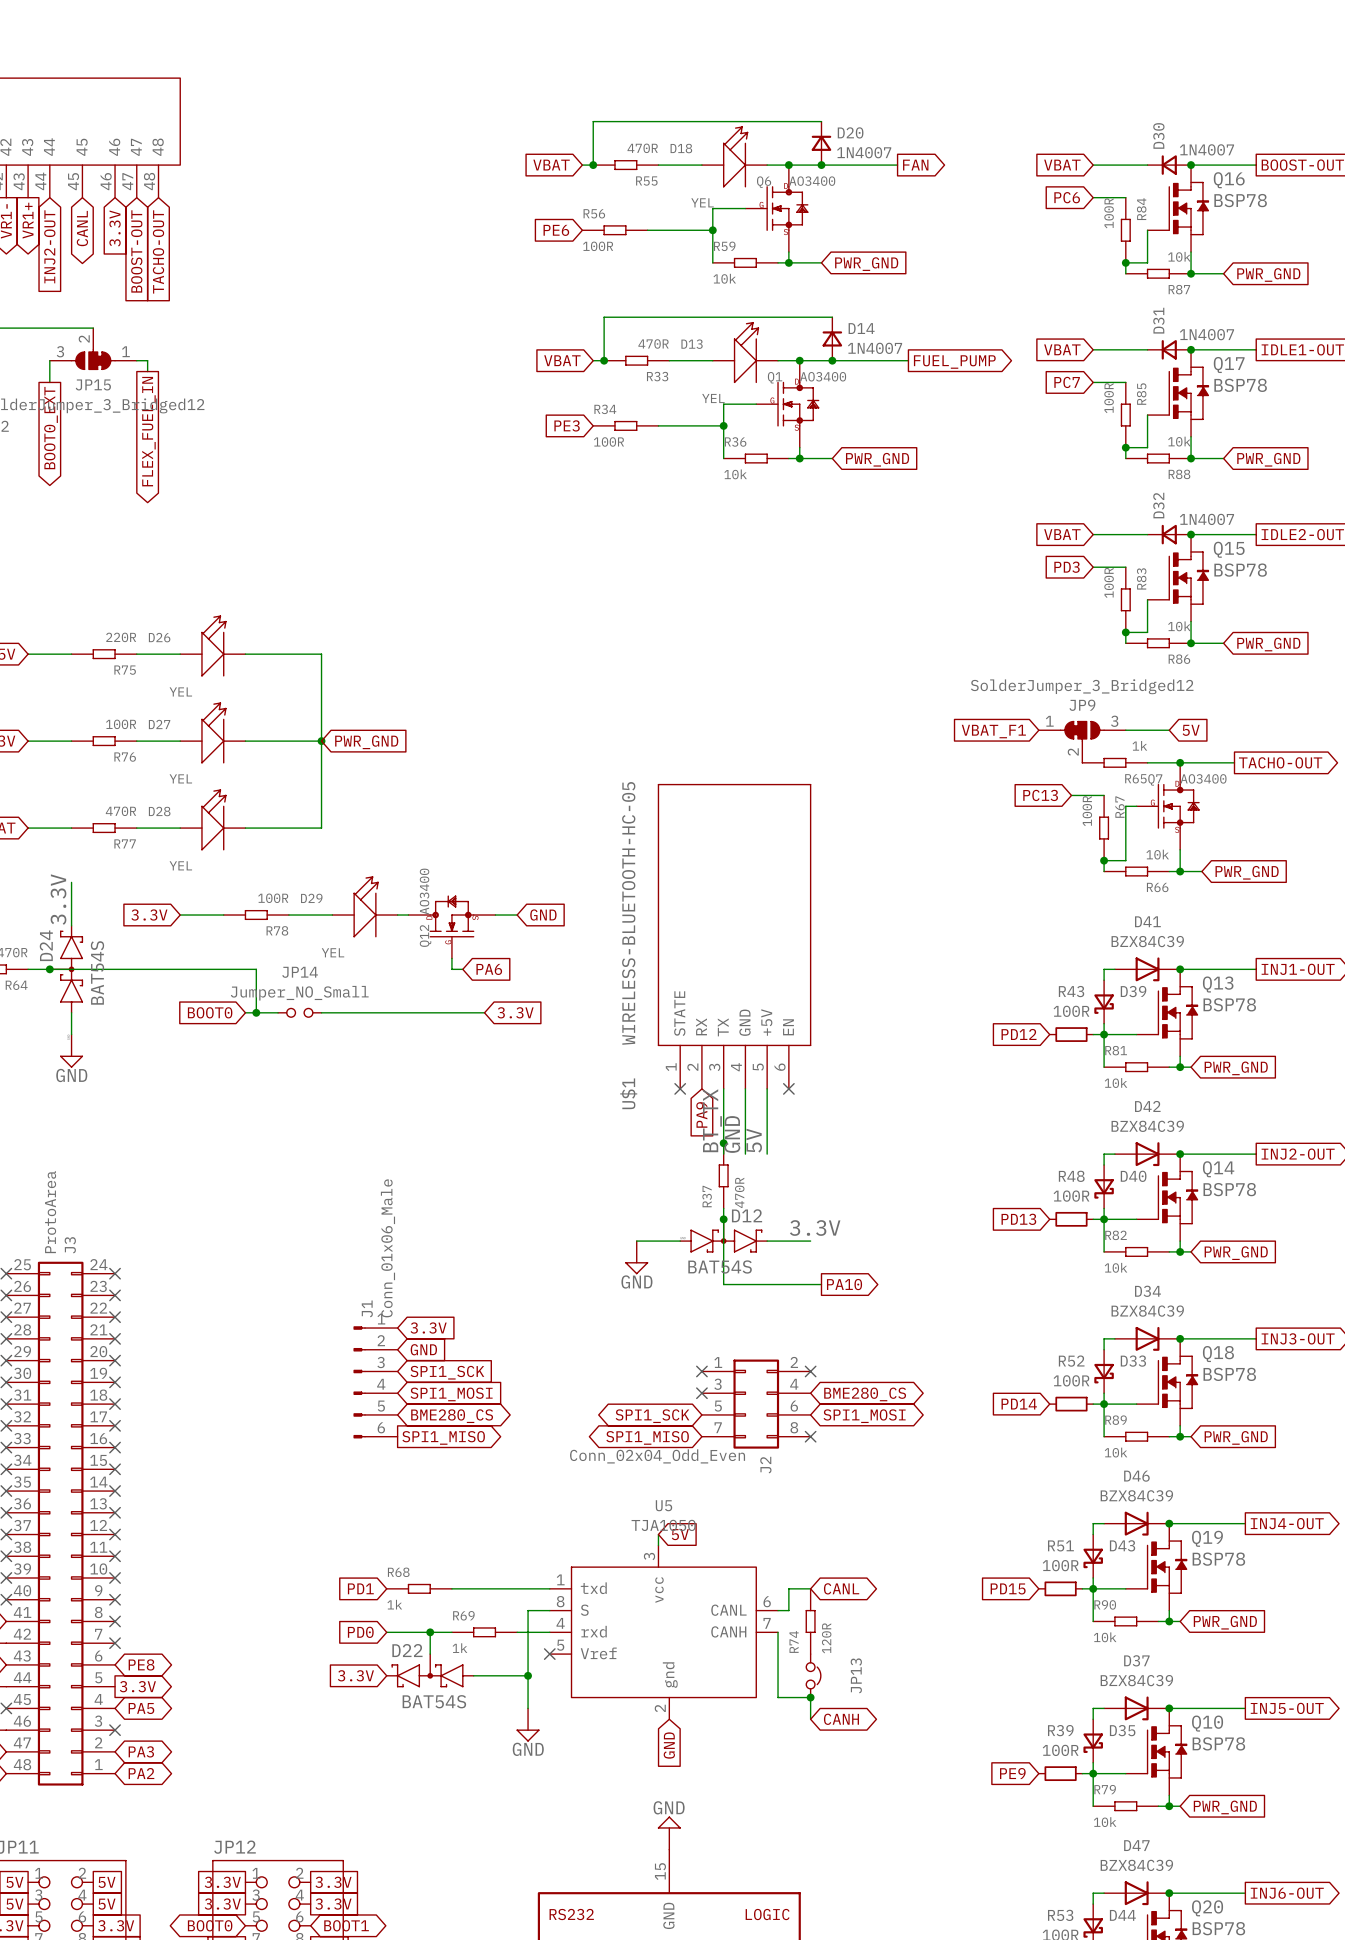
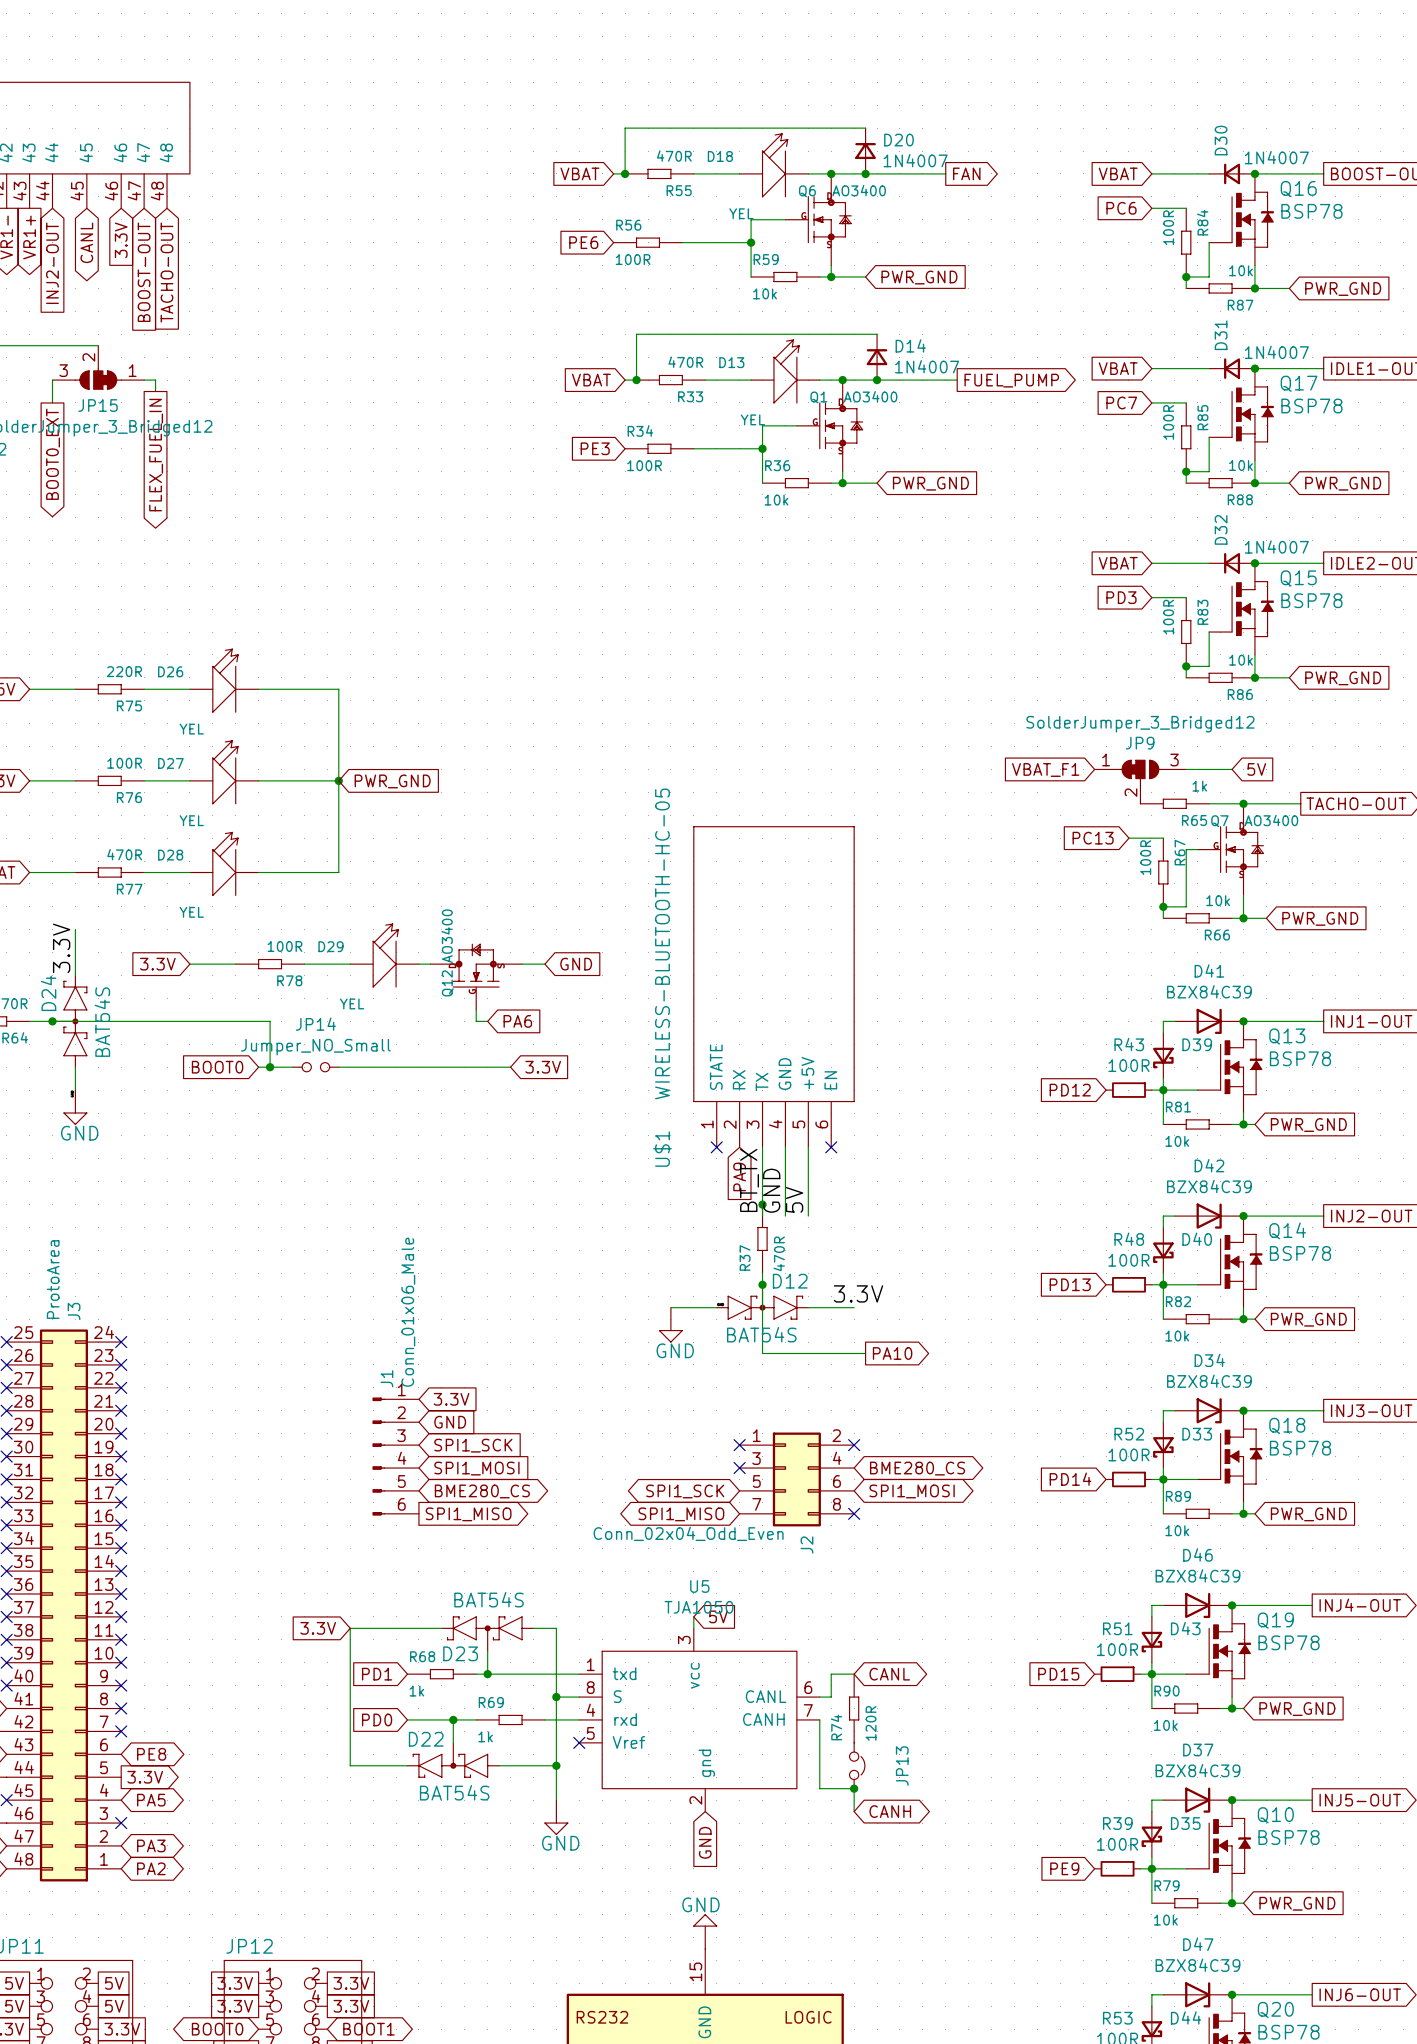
wire: none -> (441, 1628) (350, 1628) (350, 1765) (407, 1765)
wire: none -> (533, 1628) (556, 1628) (556, 1697)
D23: none -> BAT54S (487, 1634)
wire: none -> (487, 1651) (487, 1674)
junction: none -> (487, 1674)
junction: none -> (556, 1697)
global label position: 3.3V (355, 1675) -> 3.3V (318, 1628)

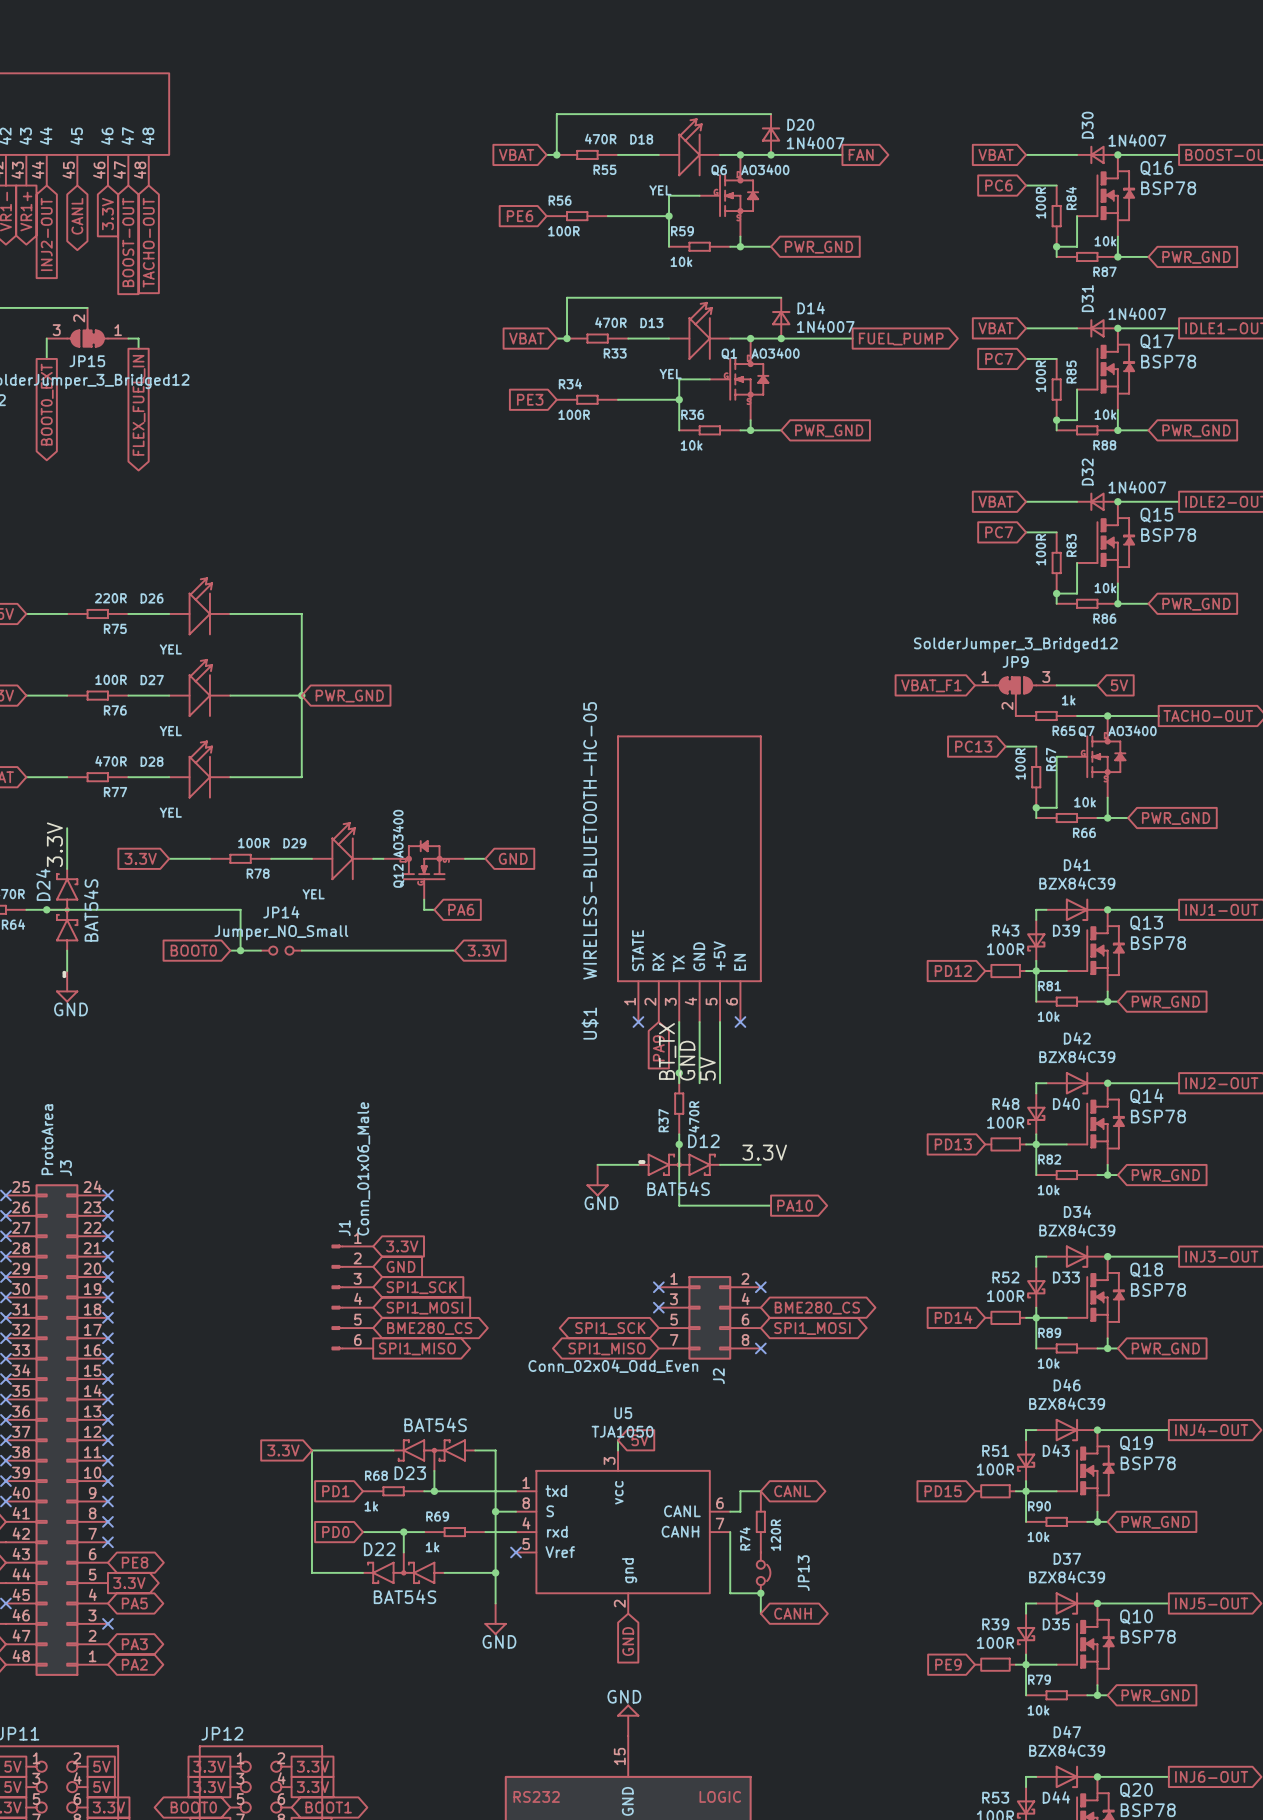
global label: PD3 (1121, 597) -> PC7 (999, 532)

